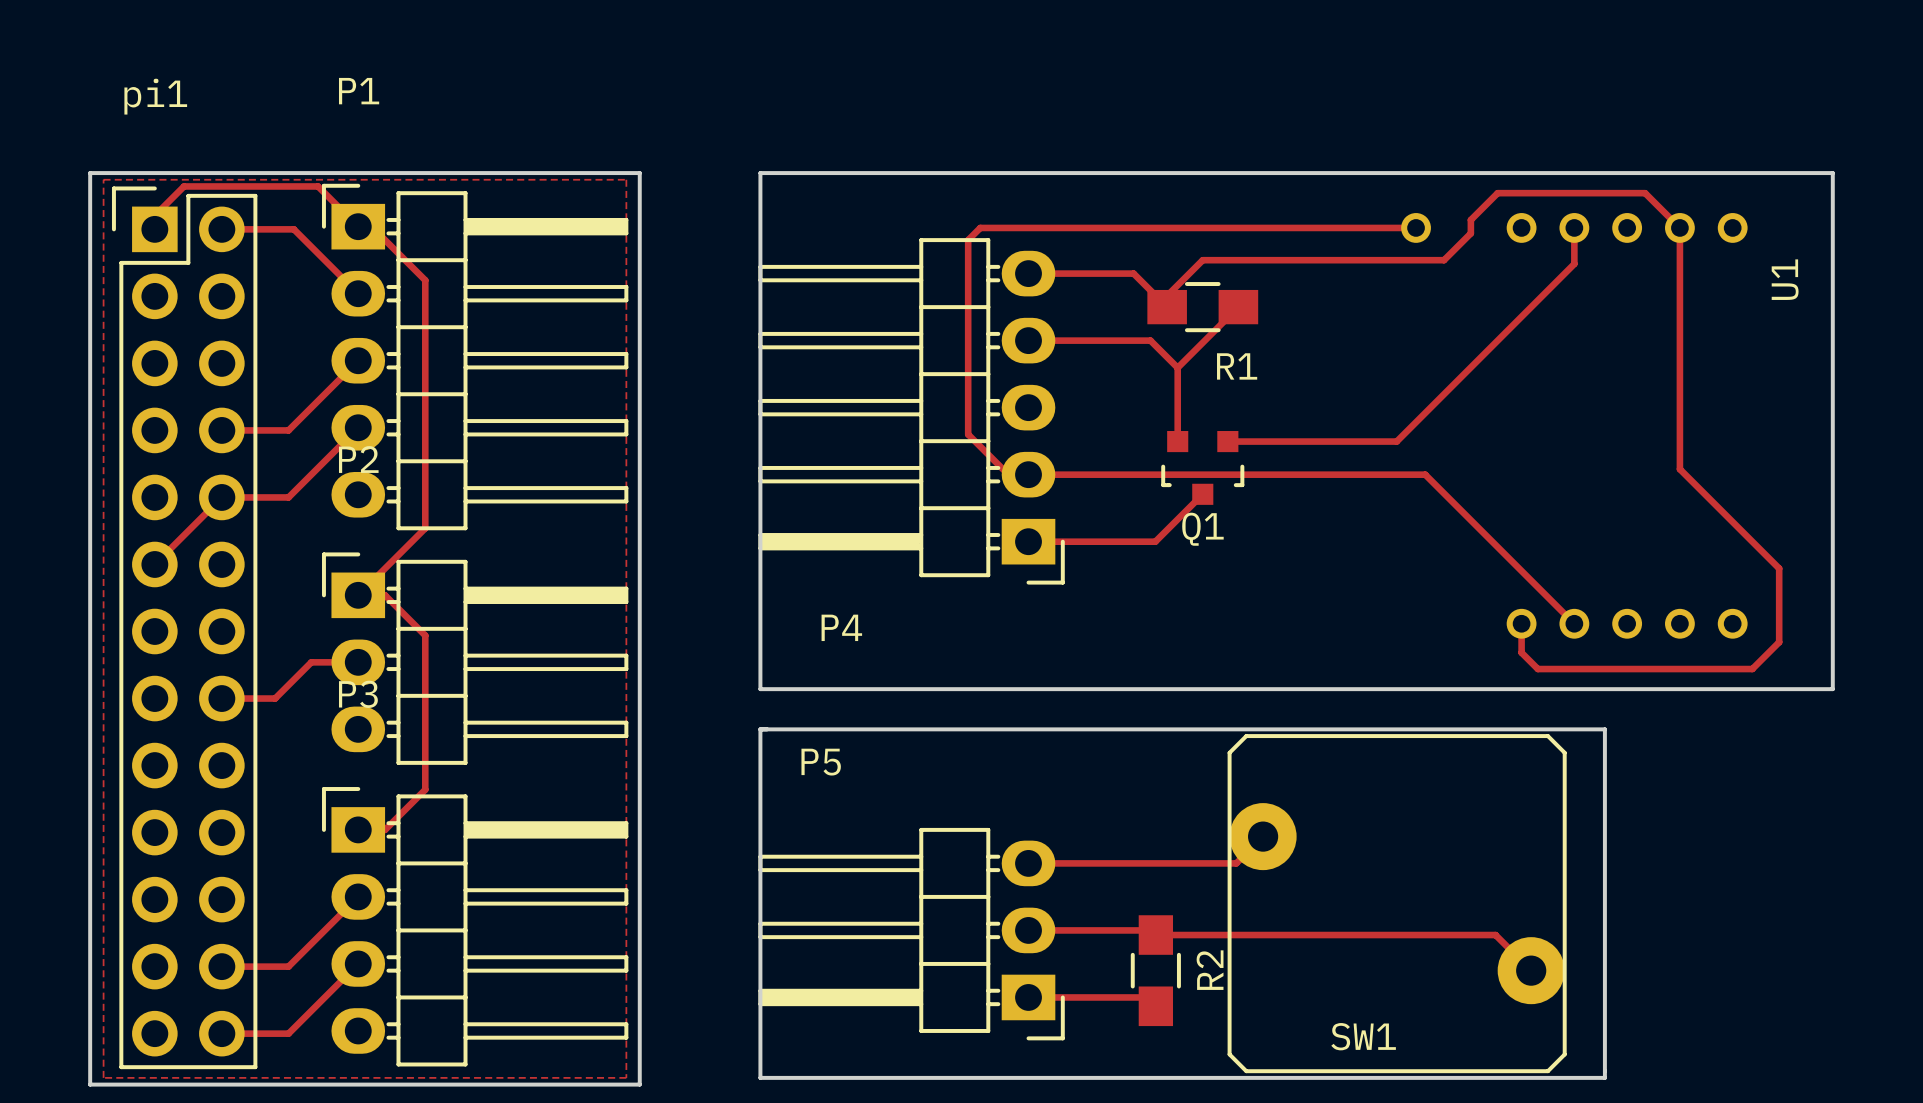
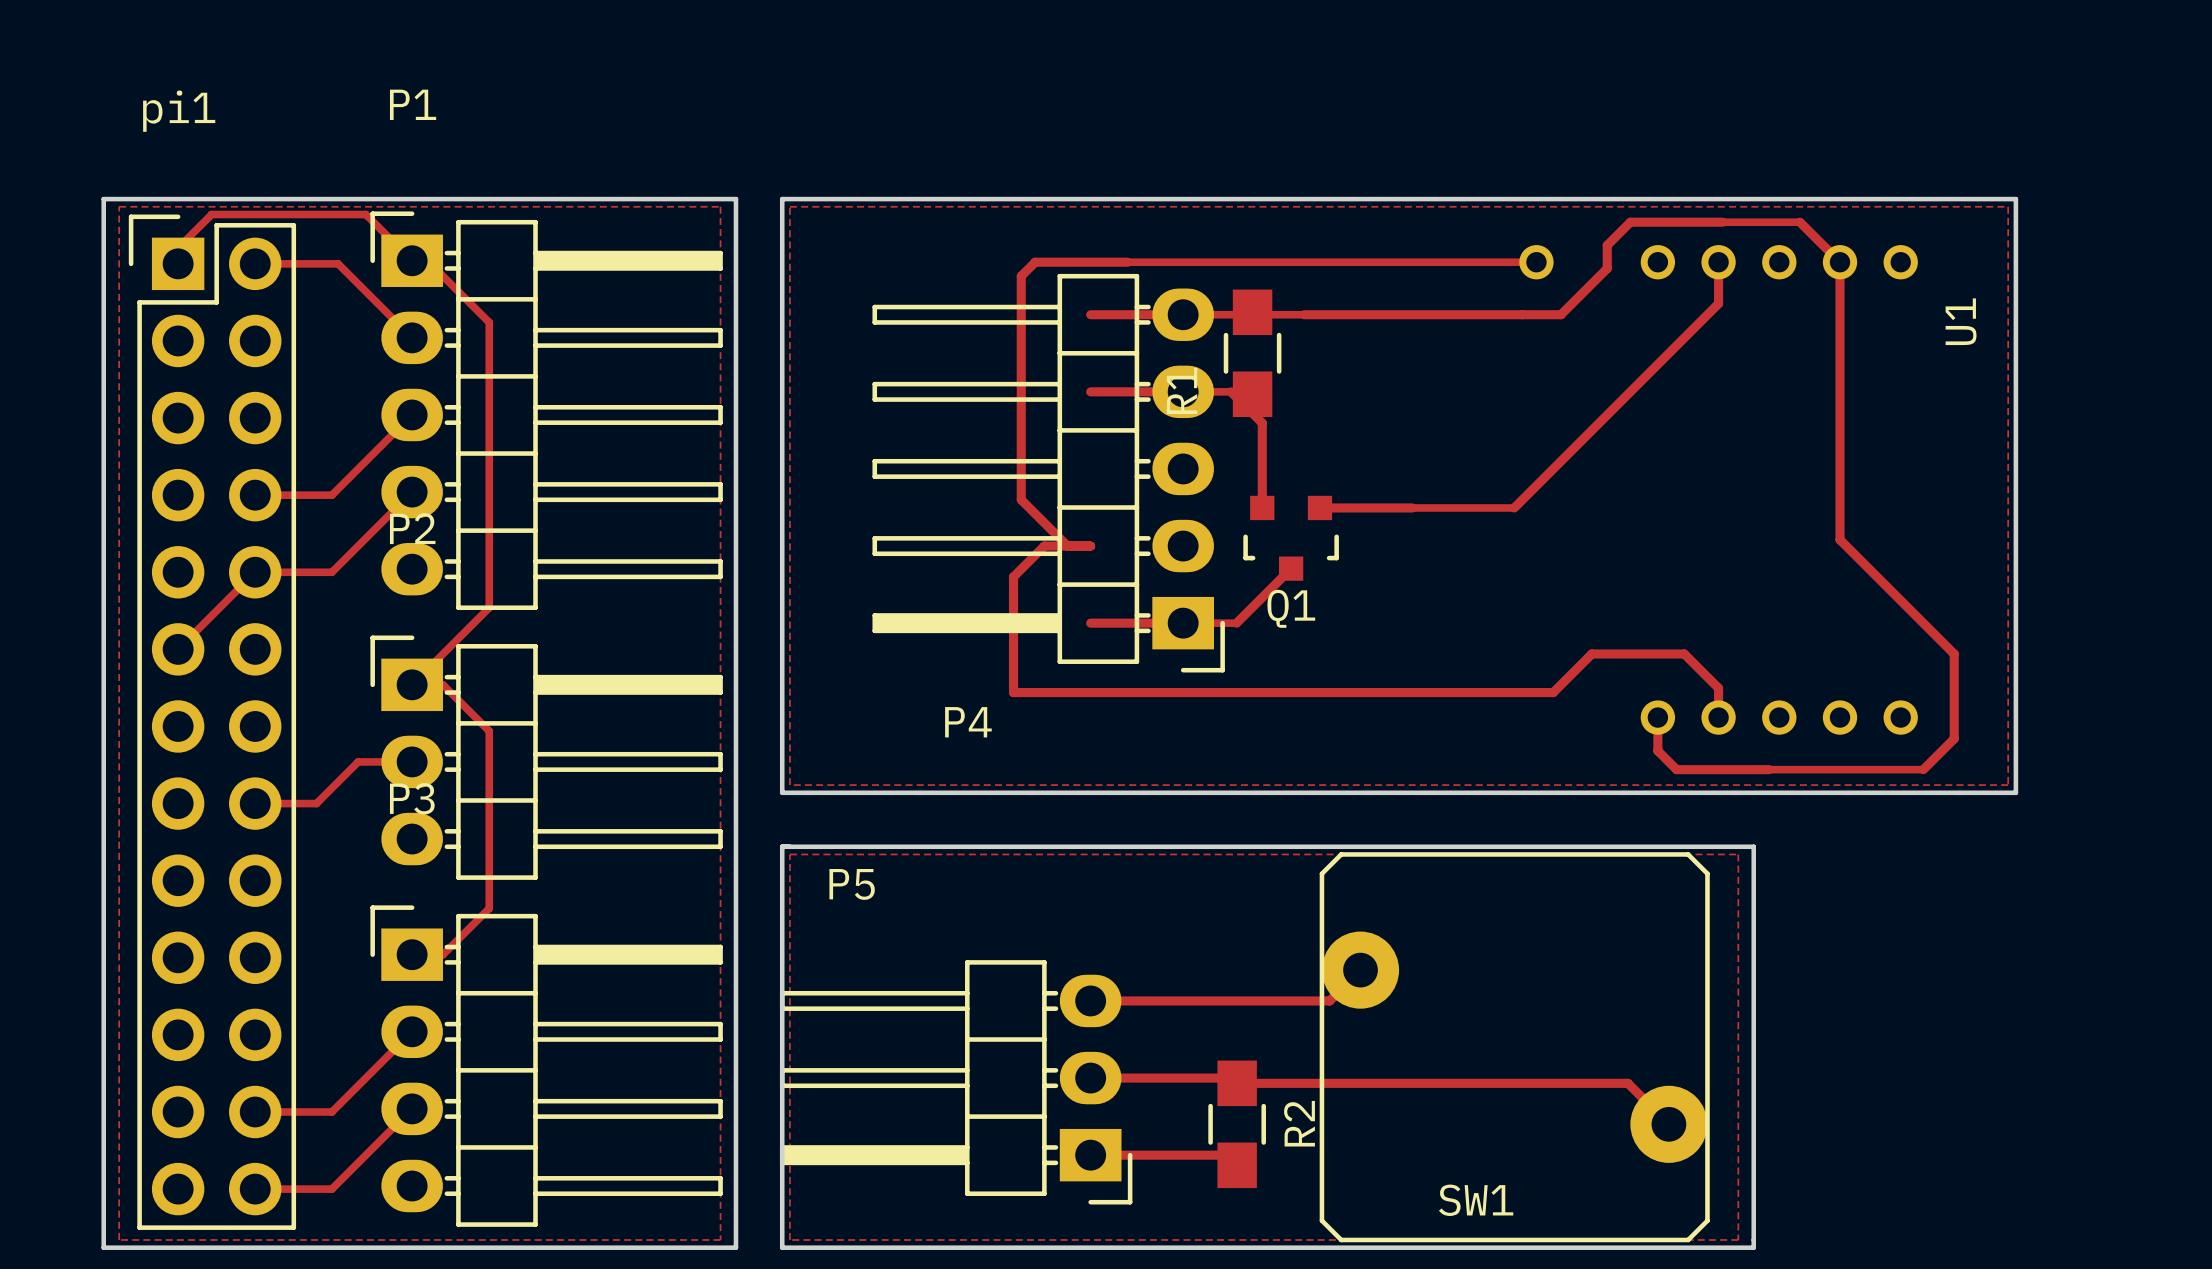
board edge: (760, 173) (760, 689) -> (874, 199) (782, 199) (782, 792) (874, 792)
board edge: (1752, 173) (1832, 173) (1832, 689) (1752, 689) -> (2015, 199) (2015, 792)
top zone outline: none -> (789, 206) (789, 785) (2008, 785) (2008, 206) (789, 206)
top track: (1497, 193) (1470, 219) (1470, 233) (1444, 260) (1202, 260) (1167, 295) (1167, 307) (1133, 273) -> (1722, 222) (1630, 222) (1607, 245) (1607, 268) (1560, 314) (1304, 314)
top track: (1564, 193) (1645, 193) (1679, 227) (1679, 469) (1779, 568) (1779, 642) (1752, 669) (1671, 669) -> (1800, 222) (1840, 262) (1840, 539) (1954, 653) (1954, 738) (1923, 769)
top track: (980, 227) (968, 240) (968, 434) (1008, 474) (1425, 474) (1574, 623) -> (1127, 262) (1035, 262) (1021, 276) (1021, 499) (1067, 546)
top track: (1335, 227) (1416, 227) -> (1319, 507) (1412, 507)
top track: (1574, 227) (1574, 263) (1396, 441) (1316, 441) -> (1718, 262) (1718, 303) (1514, 507)
top track: none -> (1090, 314) (1183, 314)
R1 rotation: 0° (1202, 307) -> 90° clockwise (1252, 353)
R1 position: (1202, 307) -> (1252, 353)
top track: (1238, 307) (1177, 367) -> none
top track: none -> (1090, 391) (1183, 391)
top track: (1070, 340) (1150, 340) (1177, 367) -> (1231, 391) (1262, 423) (1262, 507)
top track: (1177, 367) (1177, 441) -> none
U1 position: (1574, 425) -> (1718, 489)
Q1 position: (1202, 467) -> (1291, 538)
top track: none -> (1090, 546) (1044, 546) (1013, 576) (1013, 692) (1553, 692) (1591, 653) (1684, 653) (1718, 688) (1718, 717)
top track: (1202, 494) (1155, 541) (1074, 541) -> (1291, 568) (1236, 623)
top track: none -> (1090, 623) (1183, 623)
top track: (1521, 623) (1521, 652) (1537, 669) -> (1657, 717) (1657, 750) (1676, 769) (1769, 769)
board edge: (760, 729) (1604, 729) (1604, 1077) (760, 1077) (760, 729) -> (782, 846) (1753, 846) (1753, 1247) (782, 1247) (782, 846)
top zone outline: none -> (789, 854) (789, 1239) (1738, 1239) (1738, 854) (789, 854)
top track: (1263, 836) (1236, 863) (1028, 863) -> (1360, 970) (1329, 1000) (1090, 1000)
SW1 position: (1397, 903) -> (1514, 1047)
top track: (1028, 930) (1151, 930) (1155, 935) (1495, 935) (1531, 970) -> (1090, 1078) (1231, 1078) (1237, 1083) (1627, 1083) (1668, 1124)
P5 position: (911, 934) -> (956, 1082)
R2 position: (1155, 970) -> (1237, 1124)
top track: (1028, 997) (1147, 997) (1155, 1006) -> (1090, 1155) (1227, 1155) (1237, 1165)

